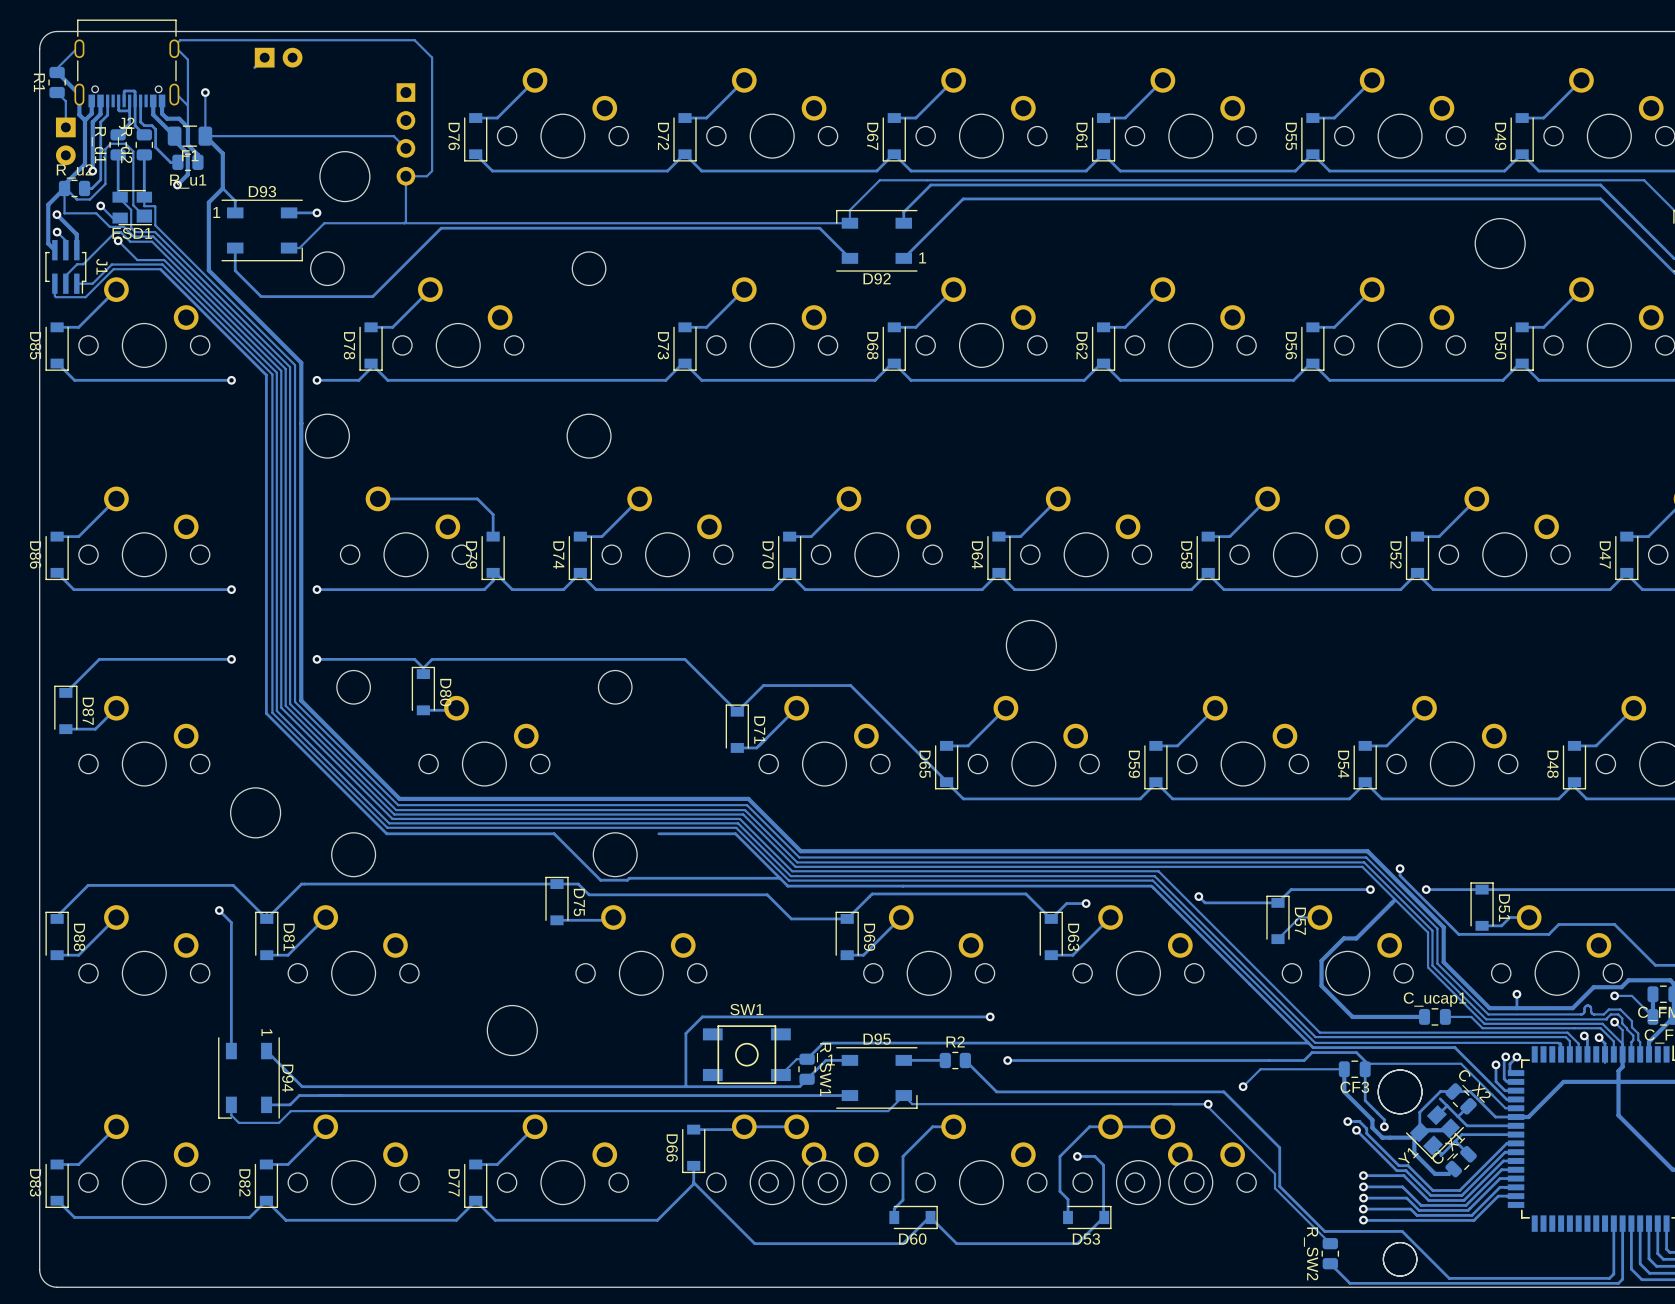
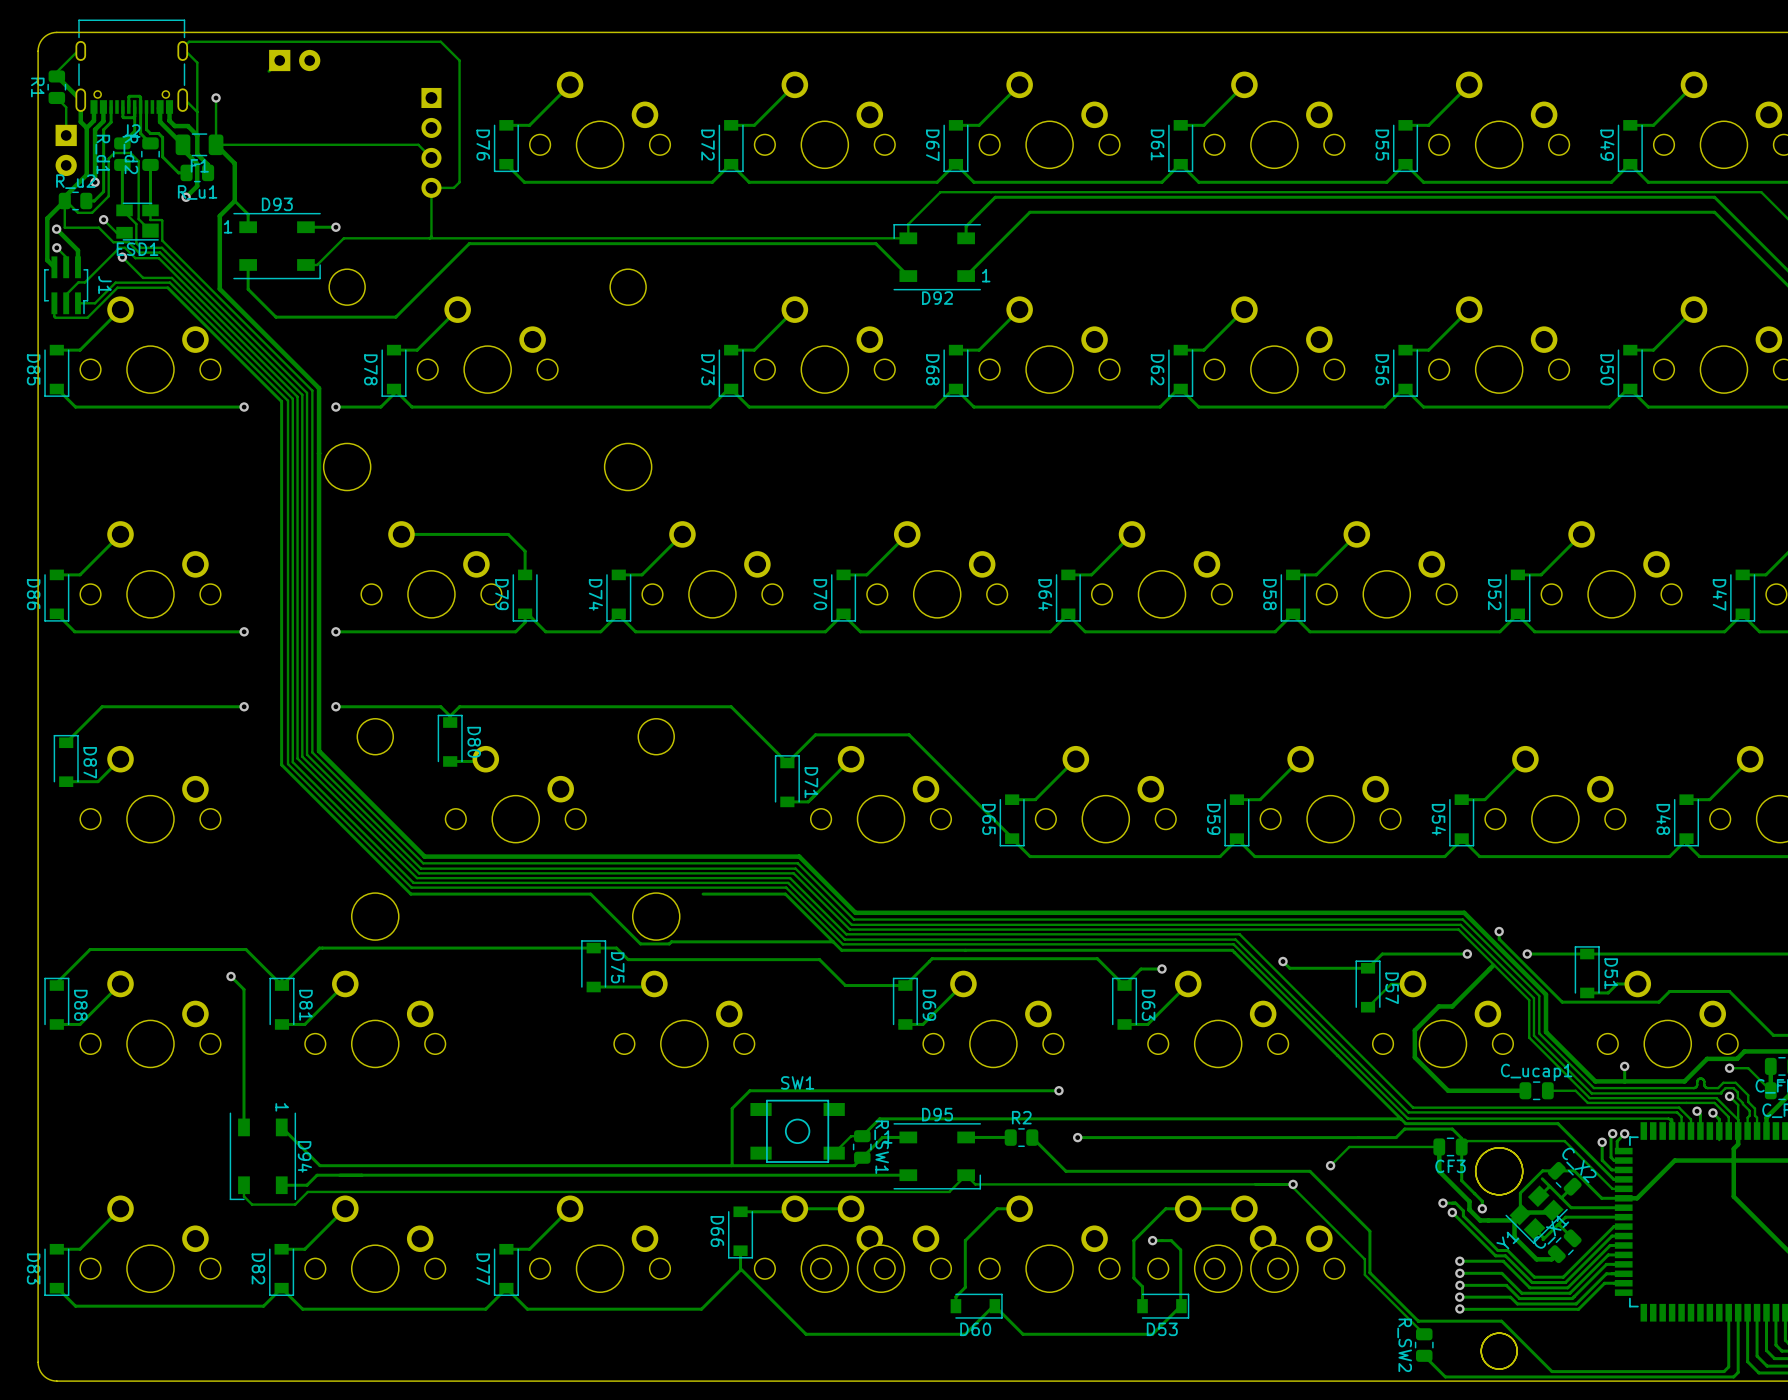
round board edge: [319, 151, 371, 202] -> none
round board edge: [1474, 218, 1526, 269] -> none
round board edge: [1006, 620, 1057, 671] -> none
round board edge: [230, 787, 281, 839] -> none
round board edge: [487, 1005, 538, 1056] -> none

